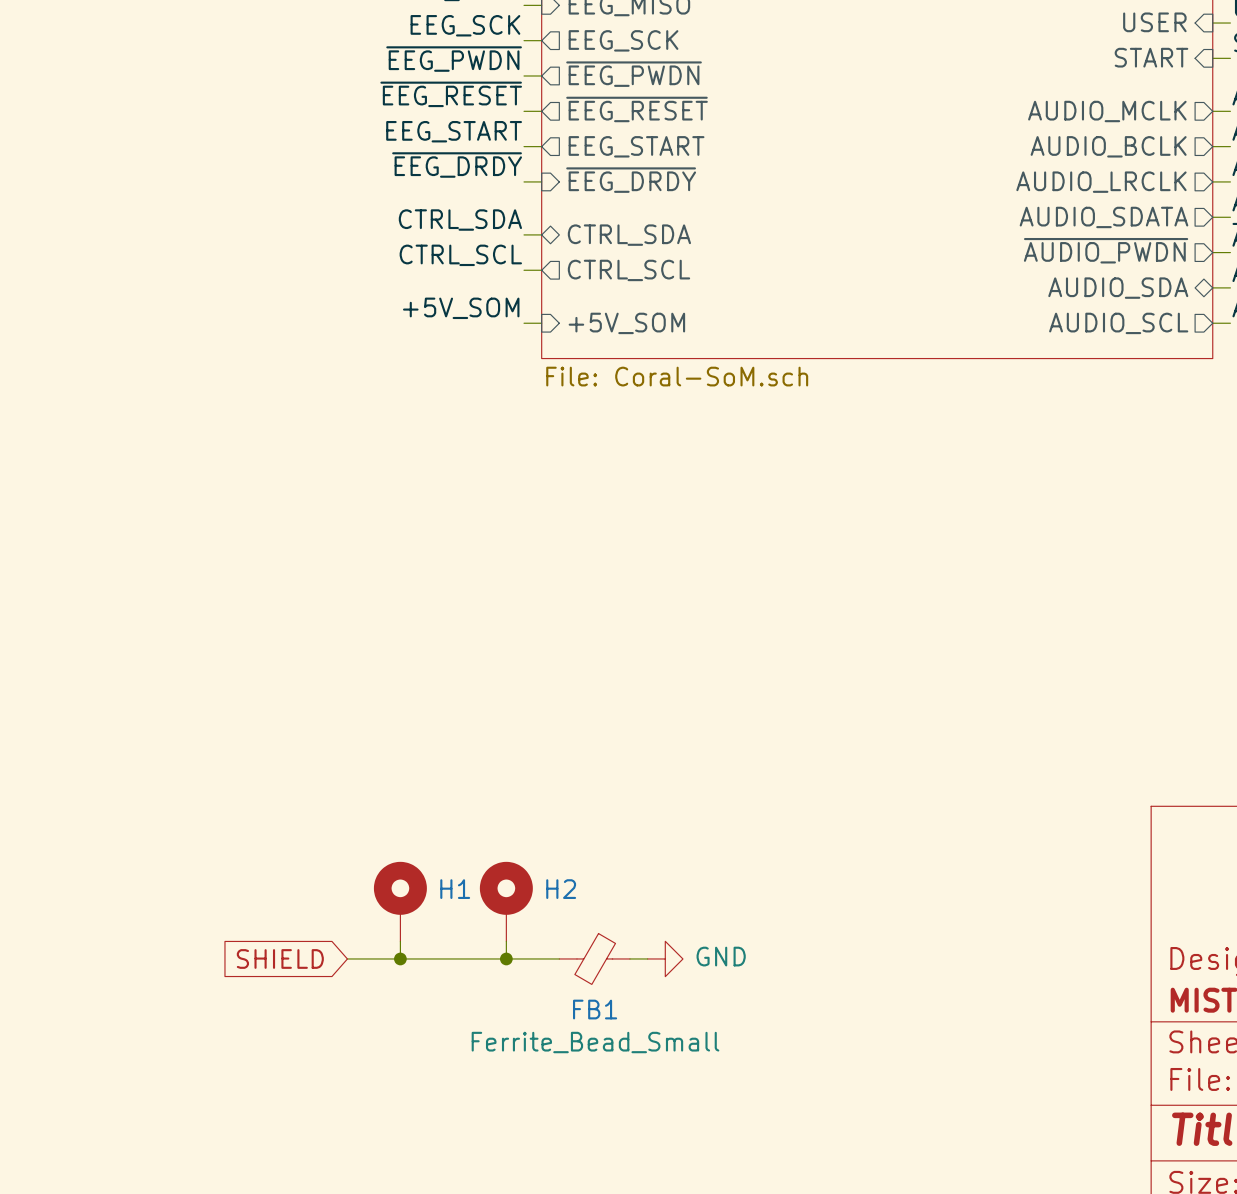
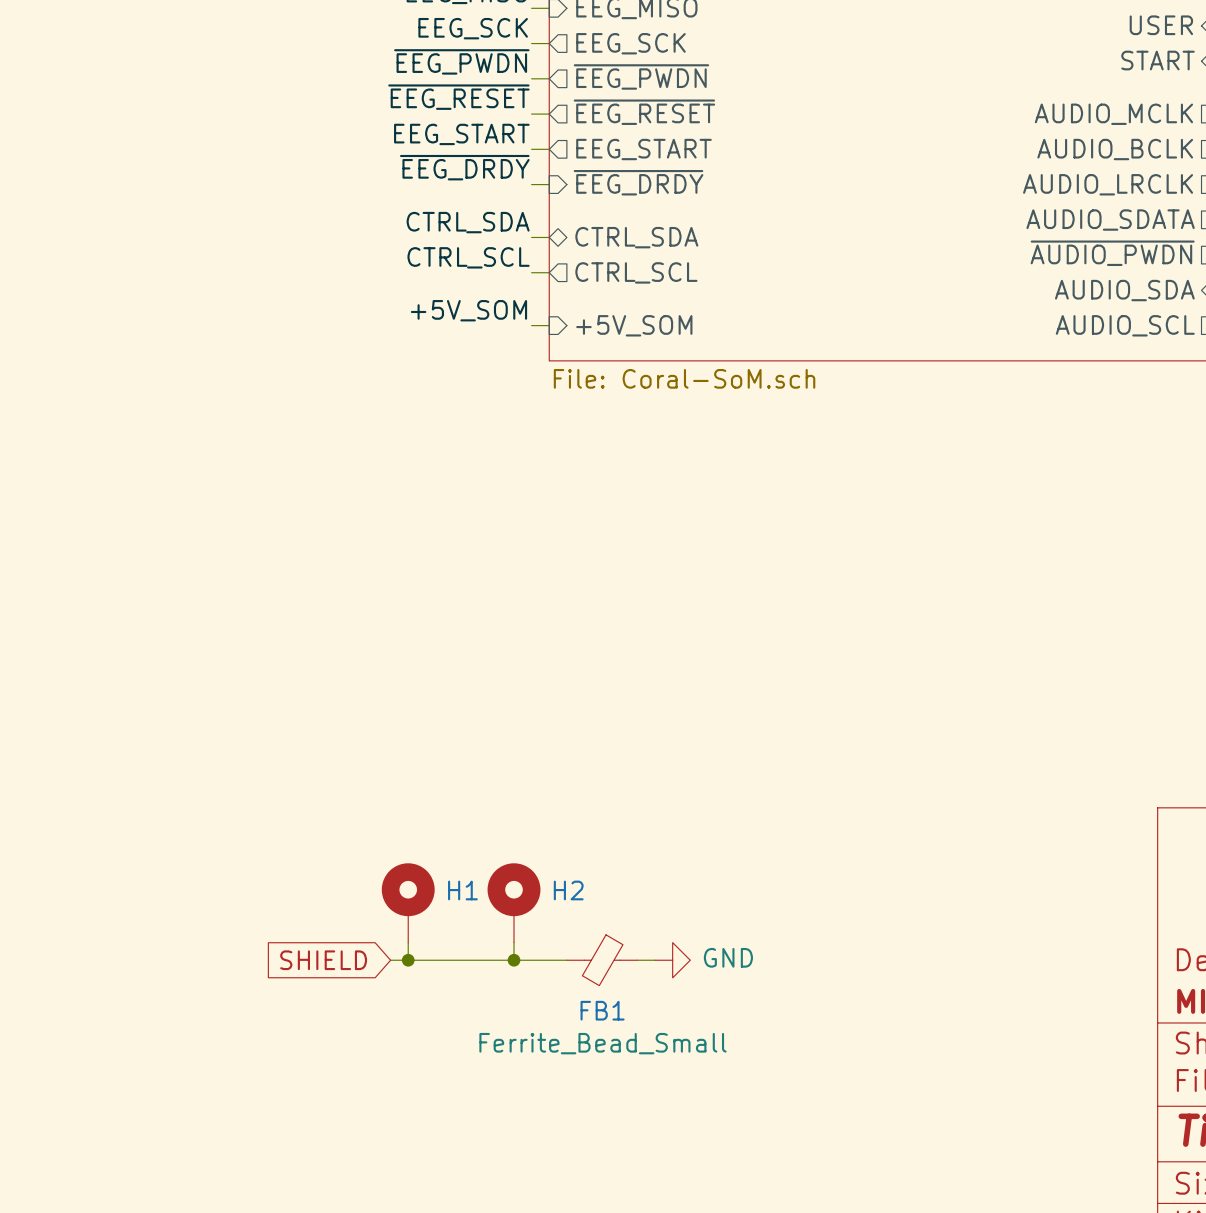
global label position: SHIELD (280, 958) -> SHIELD (323, 960)
wire: (347, 958) (382, 958) -> none

